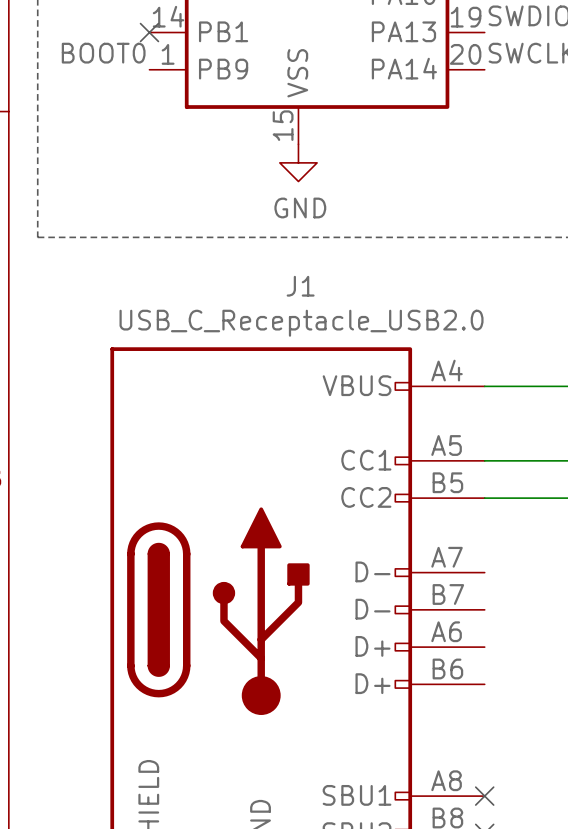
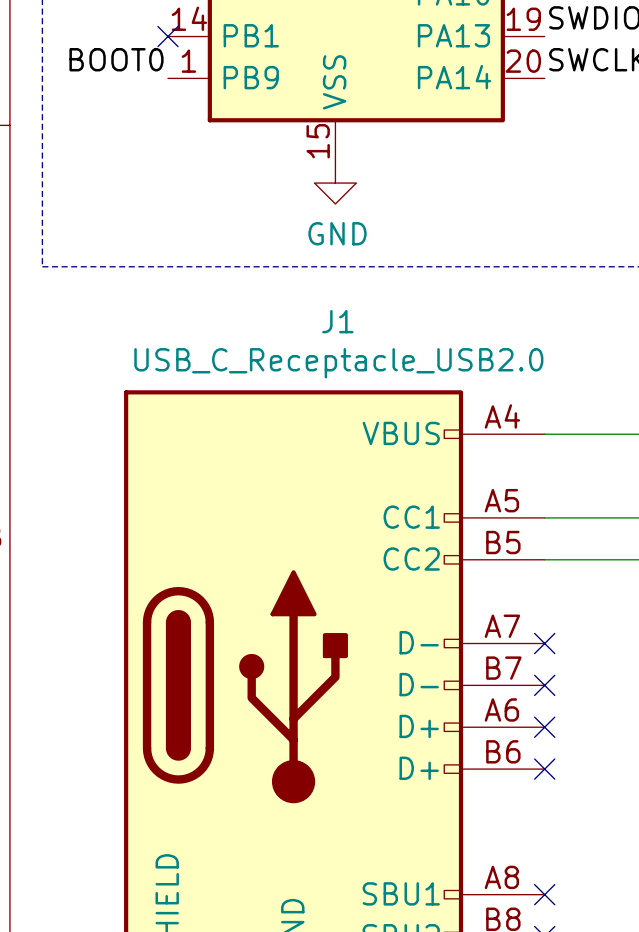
no-connect mark: none -> (544, 643)
no-connect mark: none -> (544, 685)
no-connect mark: none -> (544, 727)
no-connect mark: none -> (544, 769)

